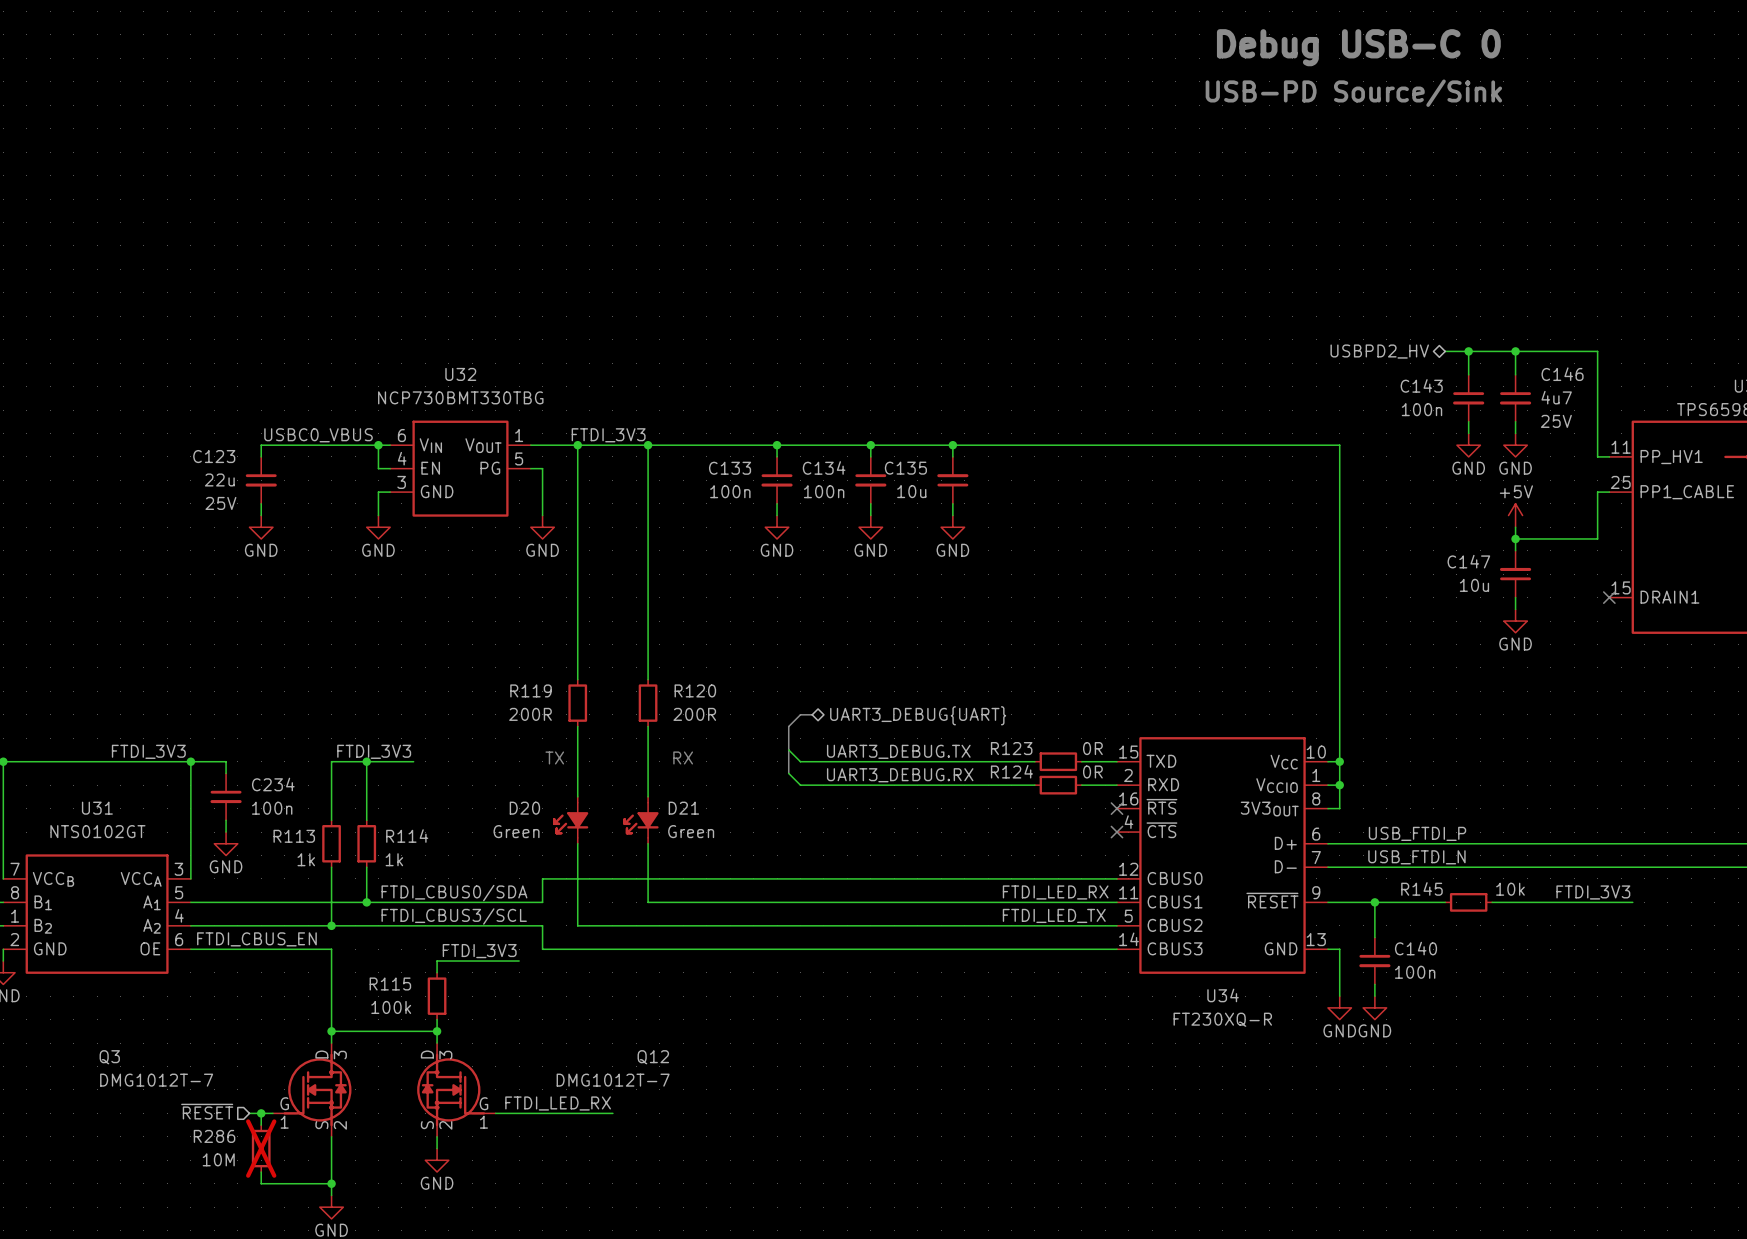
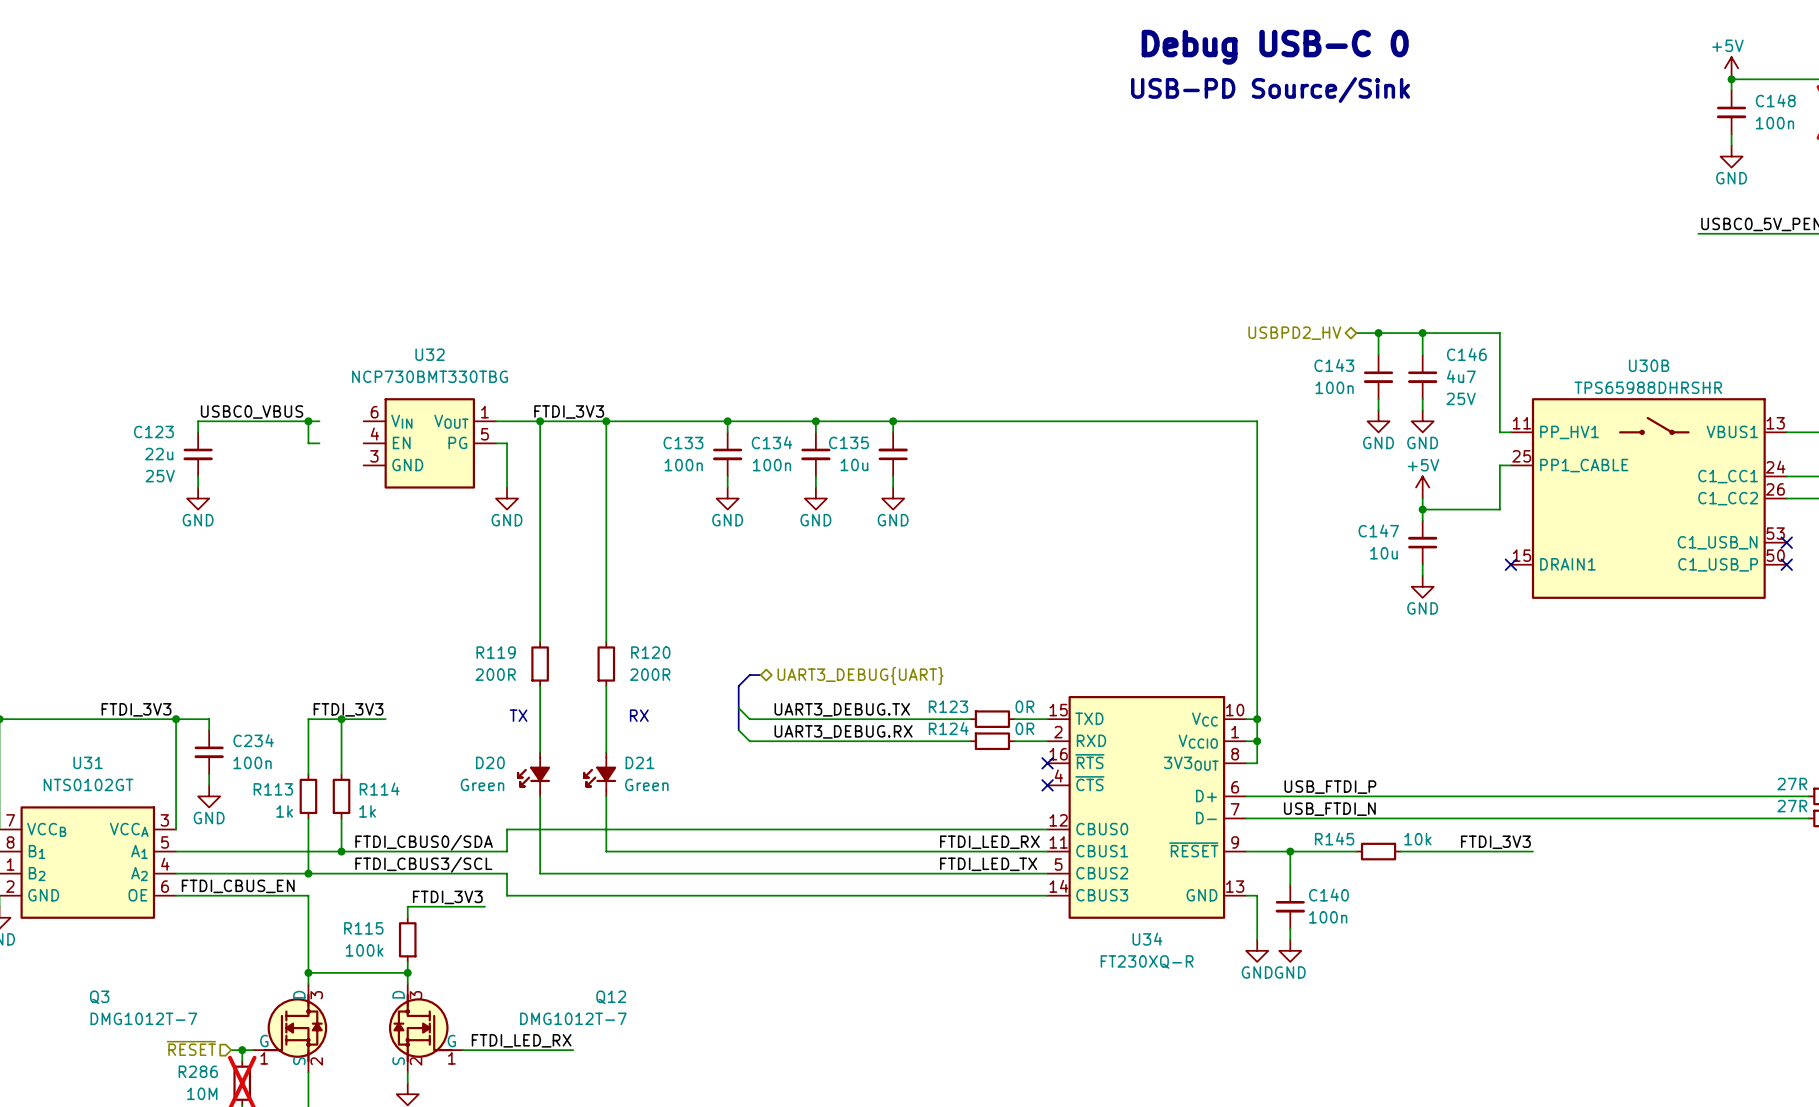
label position: USBC0_VBUS (318, 435) -> USBC0_VBUS (252, 411)
wire: (261, 445) (261, 456) -> (242, 421) (198, 421) (198, 432)
wire: (343, 445) (390, 445) -> none
wire: (378, 445) (378, 468) (390, 468) -> (308, 421) (308, 443) (319, 443)
junction position: (378, 445) -> (308, 421)
C123 position: (261, 480) -> (198, 454)
wire: (390, 492) (378, 492) (378, 515) -> none
wire: (261, 503) (261, 515) -> (198, 476) (198, 487)
power symbol position: GND (261, 527) -> GND (198, 498)
power symbol: GND (378, 527) -> none

